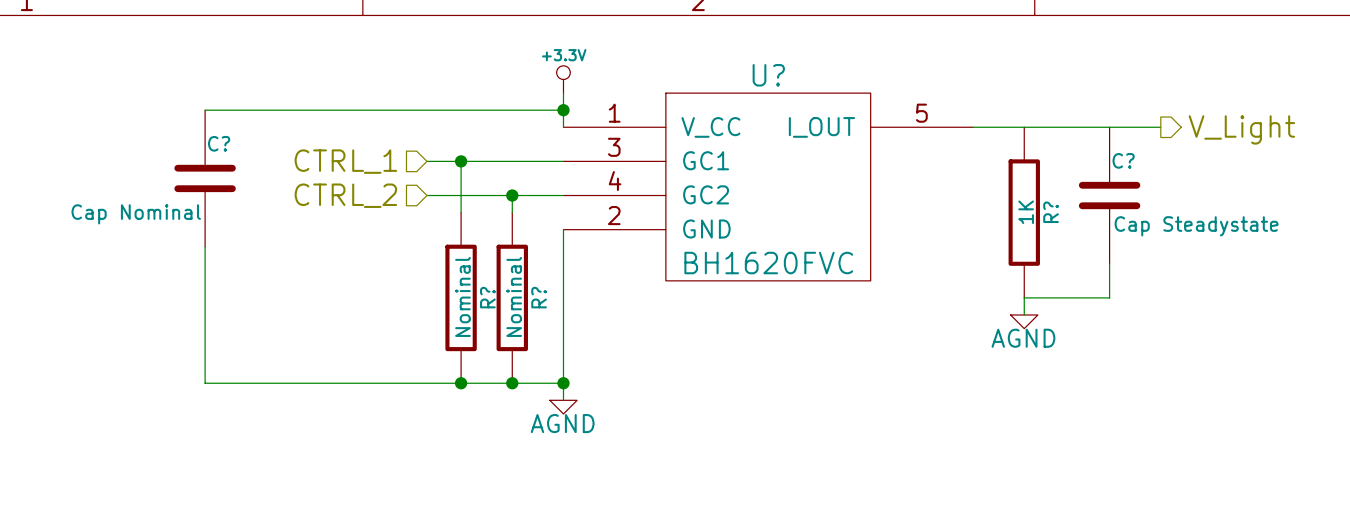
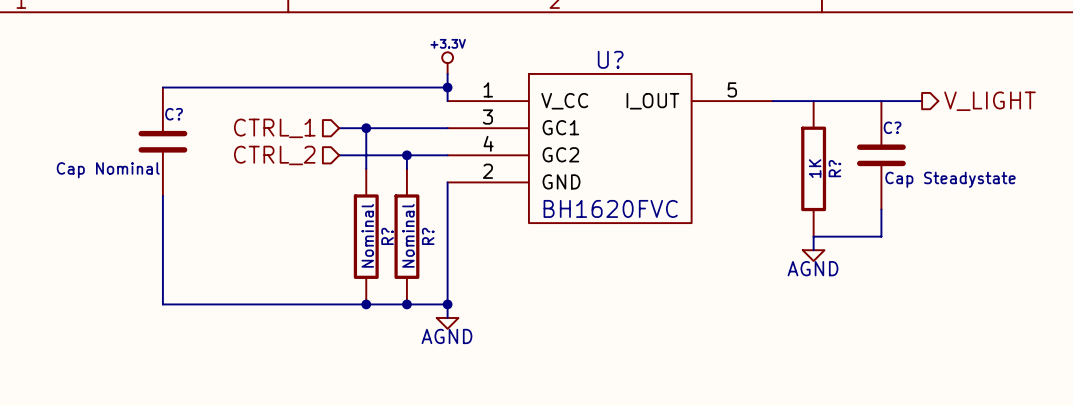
hierarchical label: V_Light (1241, 129) -> V_LIGHT (989, 101)

